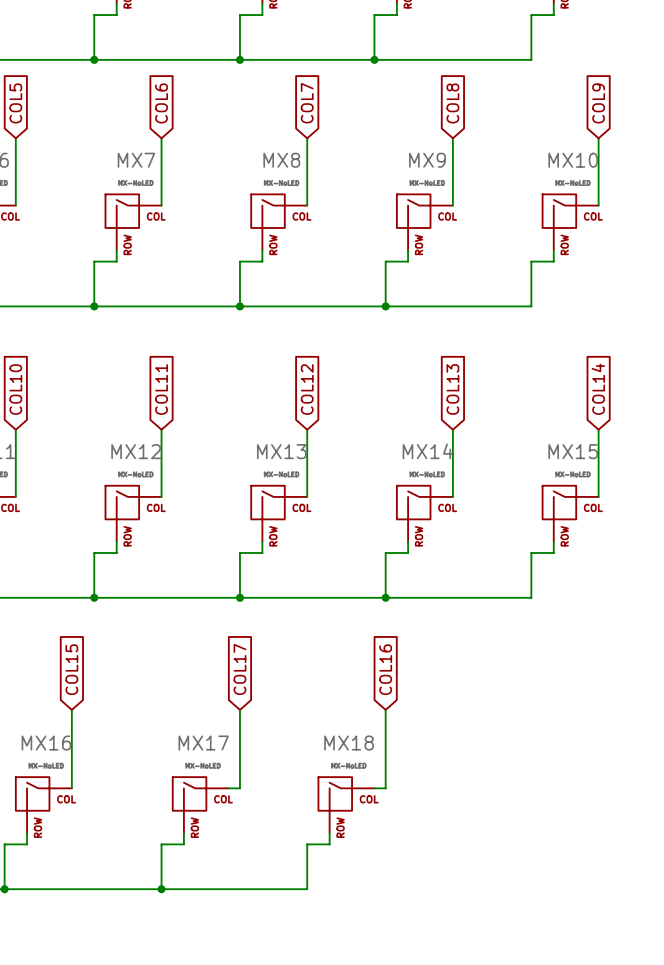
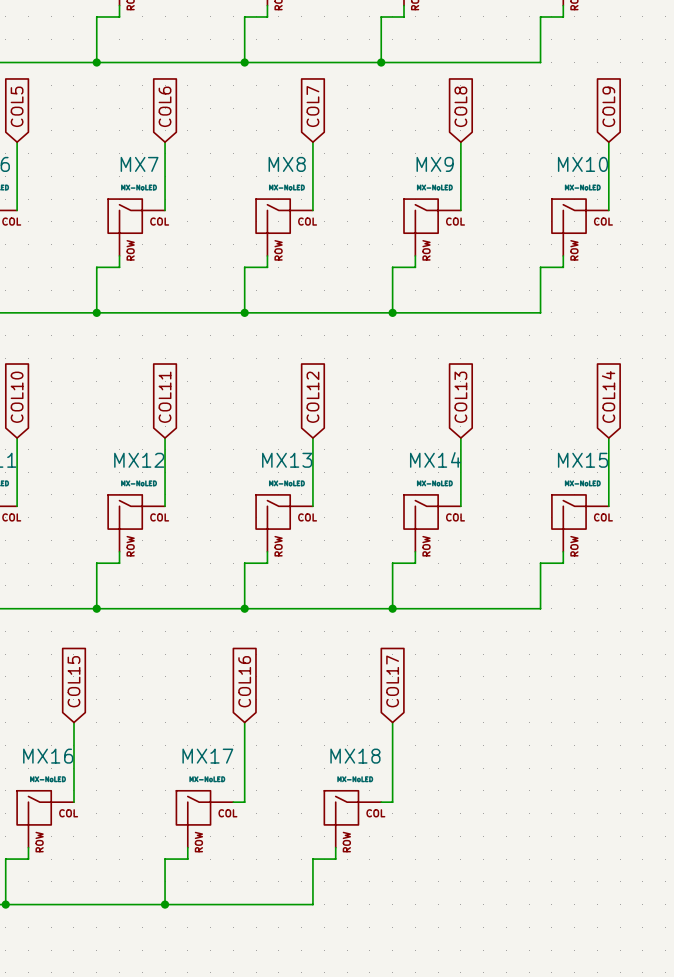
global label: COL17 (239, 669) -> COL16 (244, 681)
global label: COL16 (385, 669) -> COL17 (392, 681)

